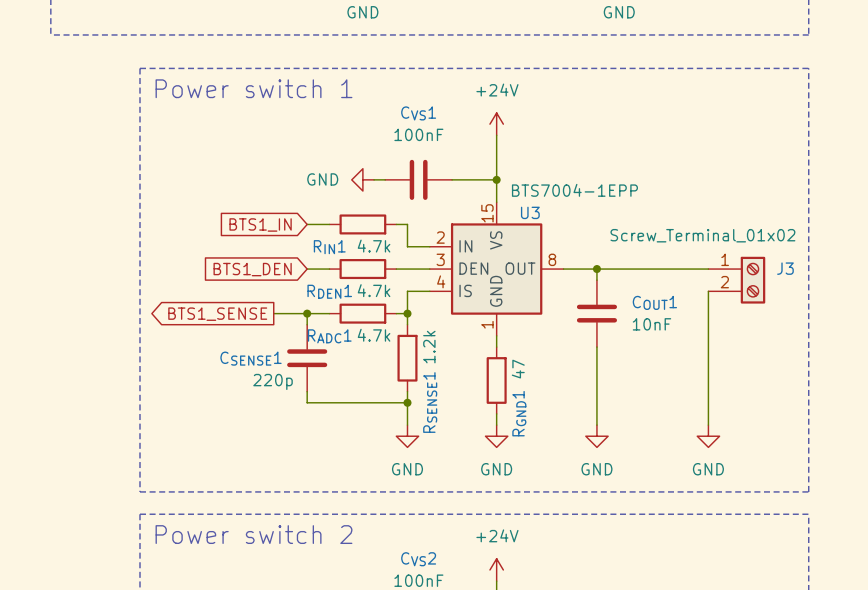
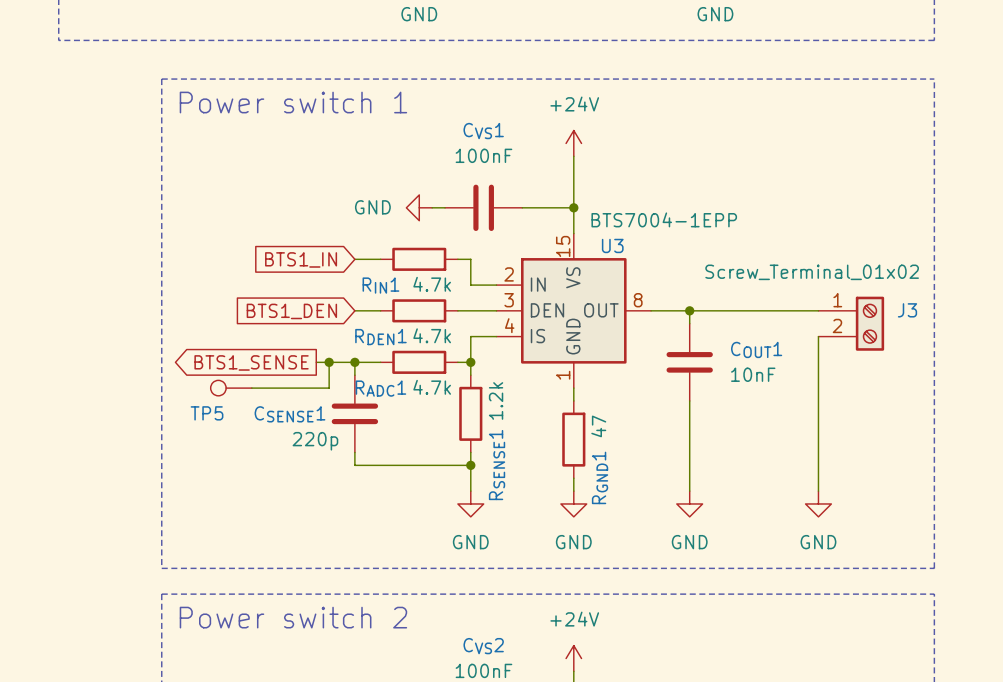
wire: none -> (329, 362) (329, 388) (251, 388)
junction: none -> (329, 362)
TP5: none -> (231, 388)

